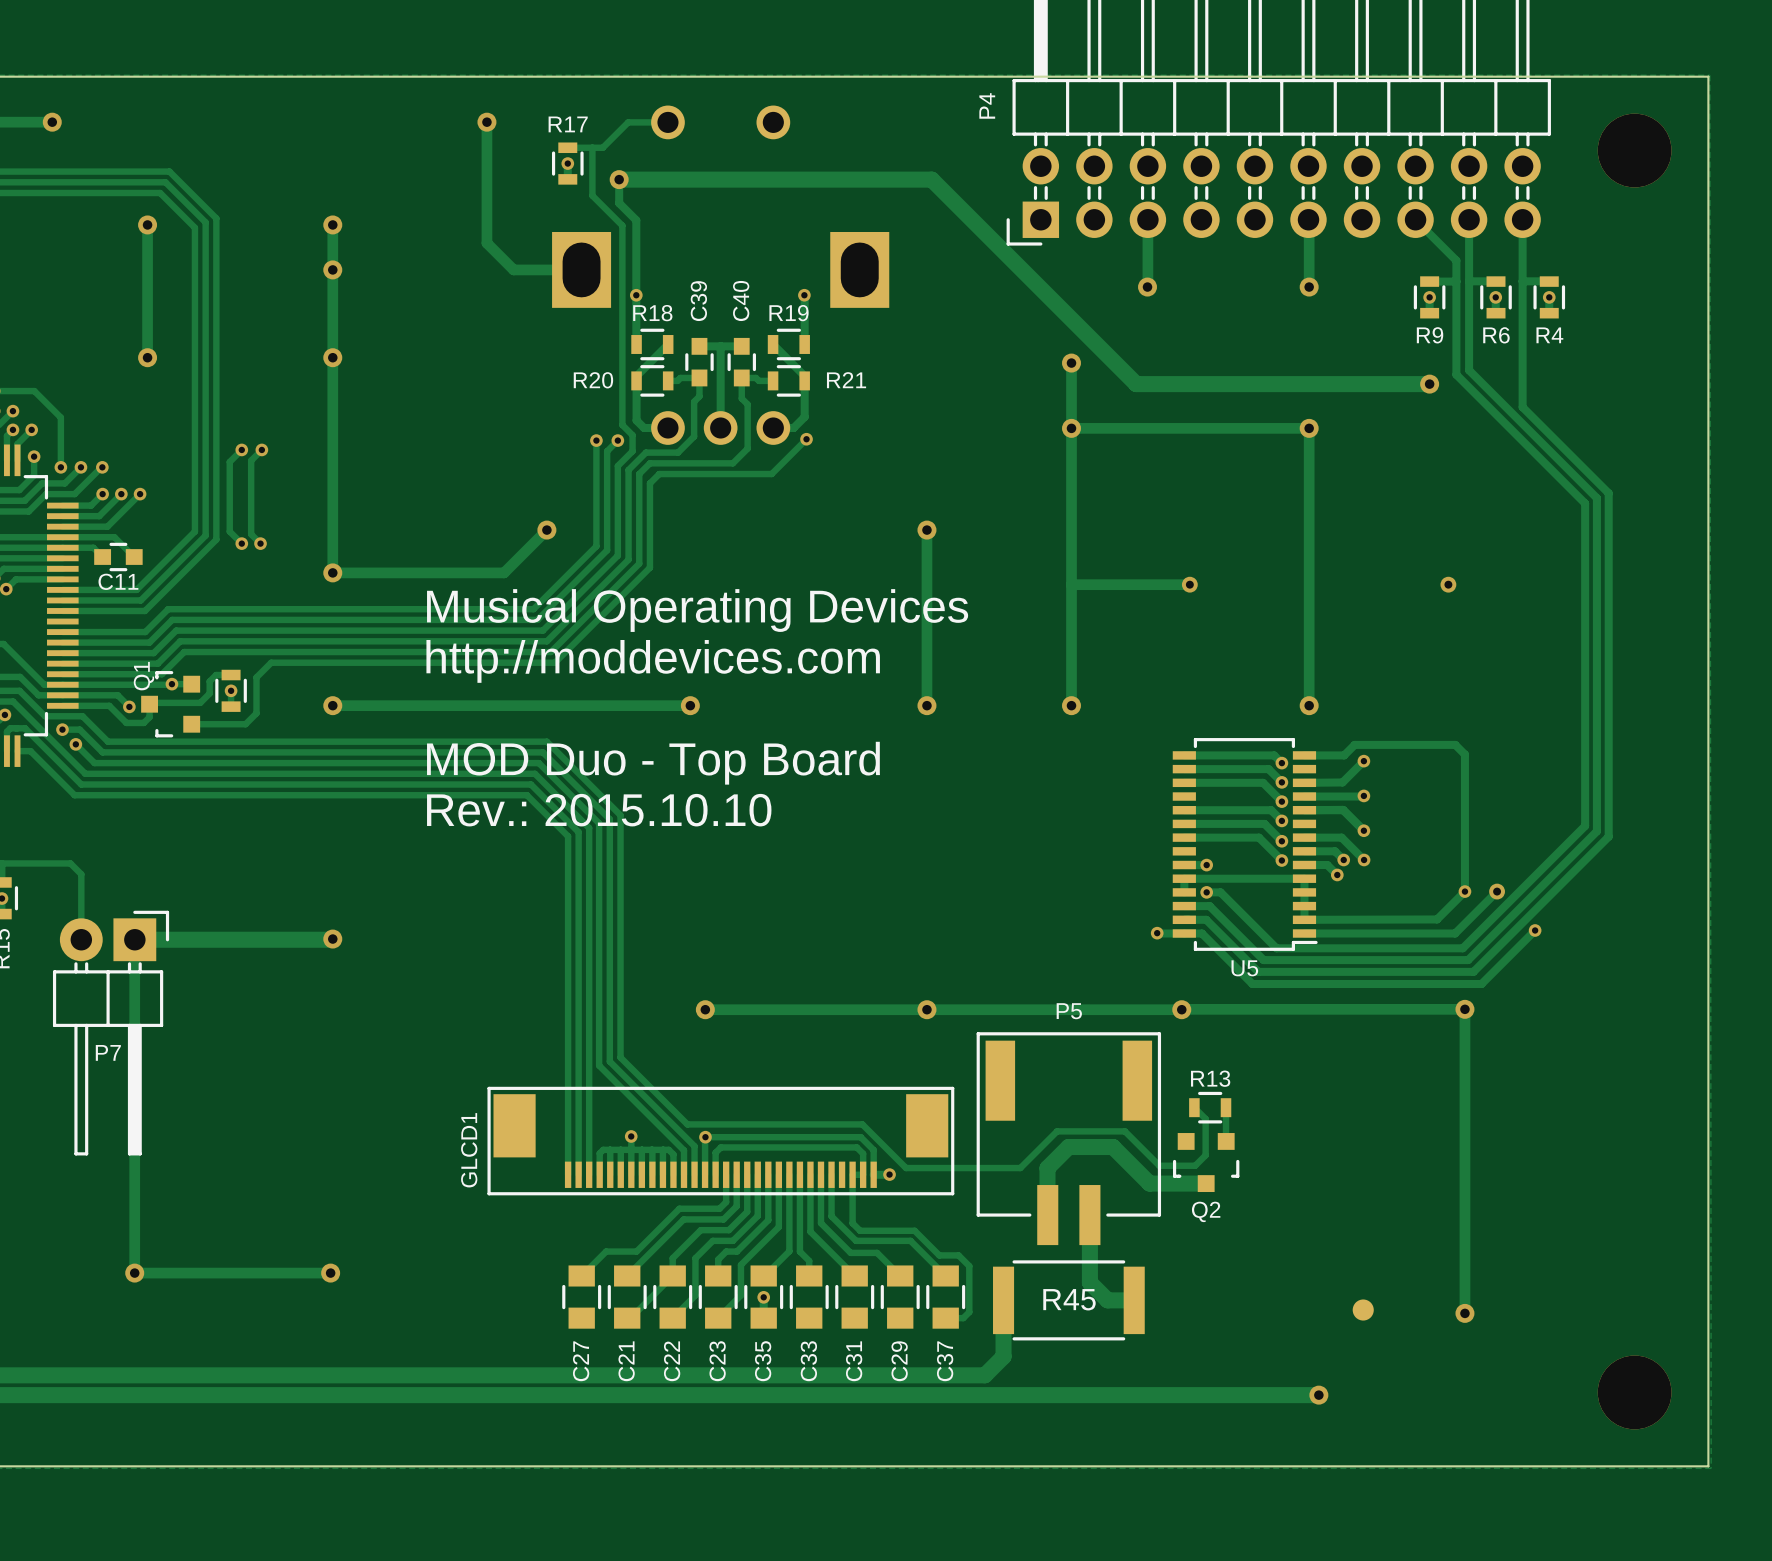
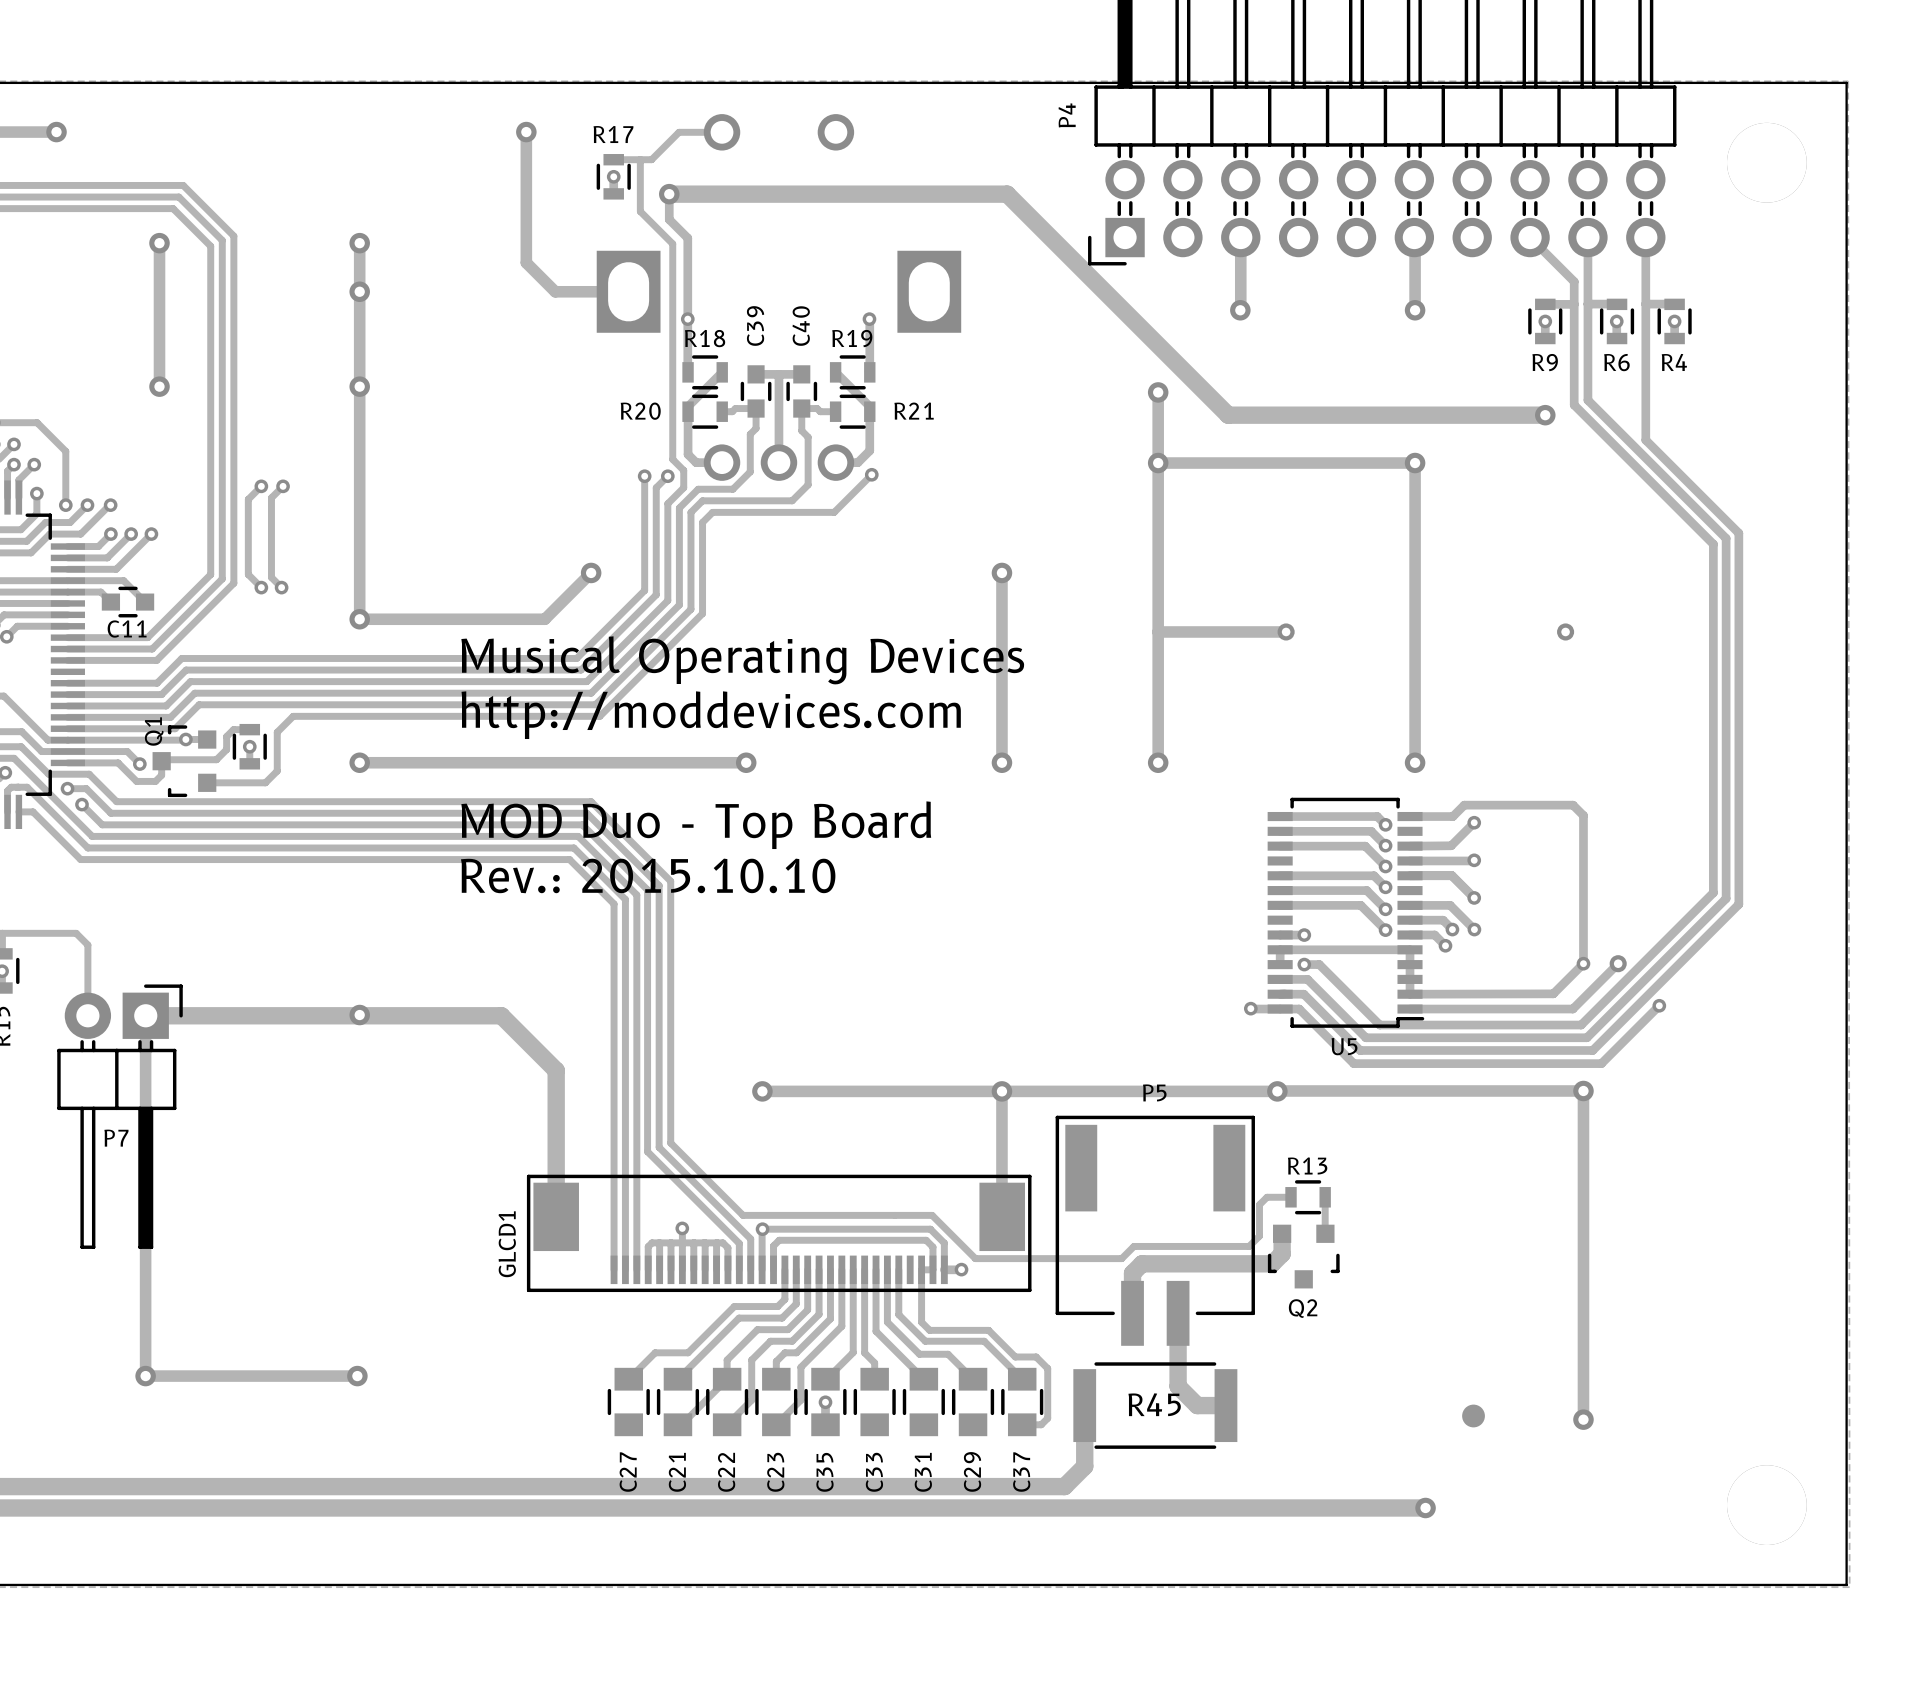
track: none -> (359, 1015) (501, 1015) (556, 1070) (556, 1216)
track: none -> (1001, 1091) (1001, 1216)
track: (1194, 1107) (1205, 1118) (1205, 1155) (1195, 1165) (1159, 1165) (1124, 1131) (1057, 1131) (1020, 1168) (906, 1168) (902, 1164) -> (1291, 1197) (1267, 1197) (1259, 1204) (1259, 1236) (1249, 1246) (1133, 1246) (1121, 1258) (975, 1258)
track: (1206, 1183) (1149, 1183) (1113, 1147) (1068, 1147) (1047, 1168) (1047, 1214) -> (1282, 1233) (1282, 1253) (1272, 1263) (1142, 1263) (1132, 1273) (1132, 1313)

